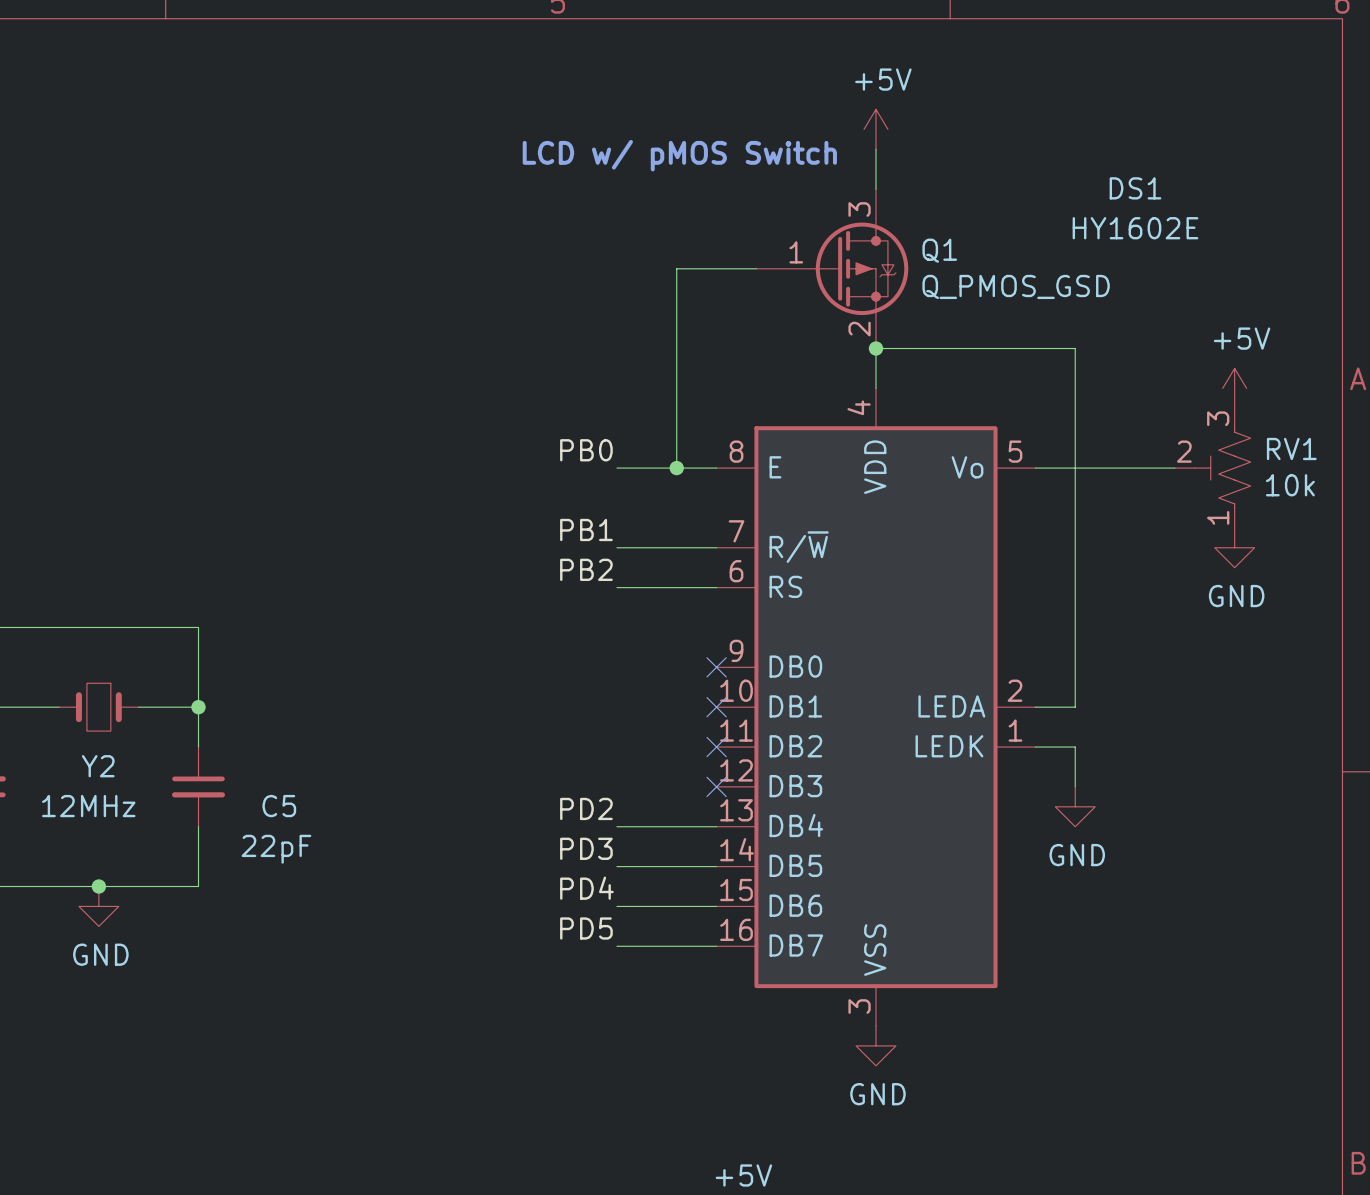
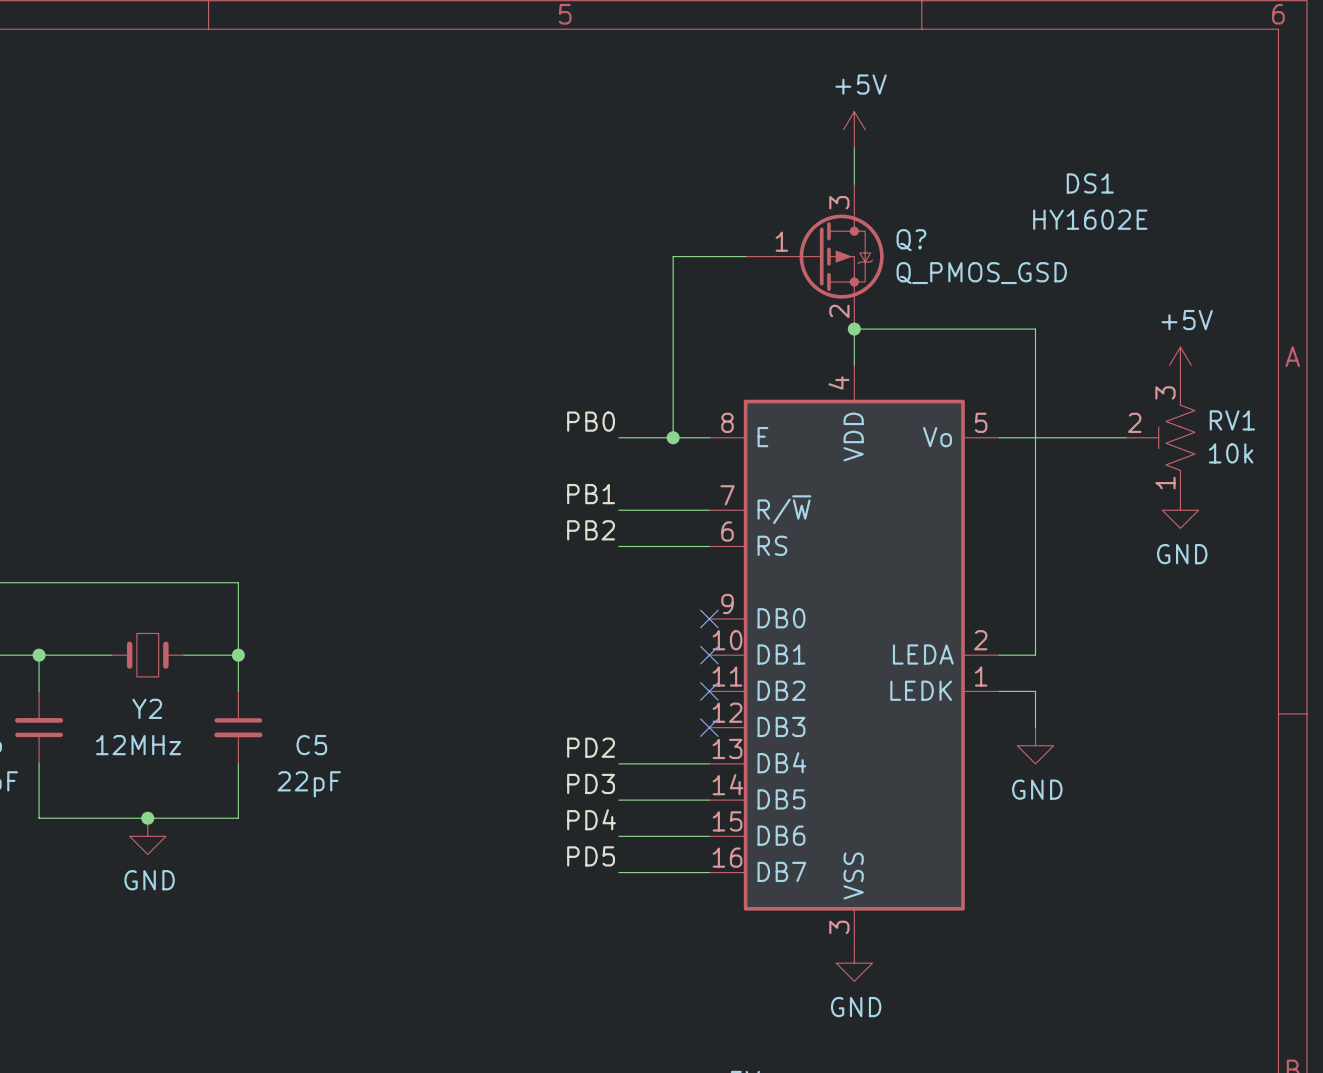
text: LCD w/ pMOS Switch (679, 155) -> none
Q1 name: Q1 (939, 250) -> Q? (911, 240)

